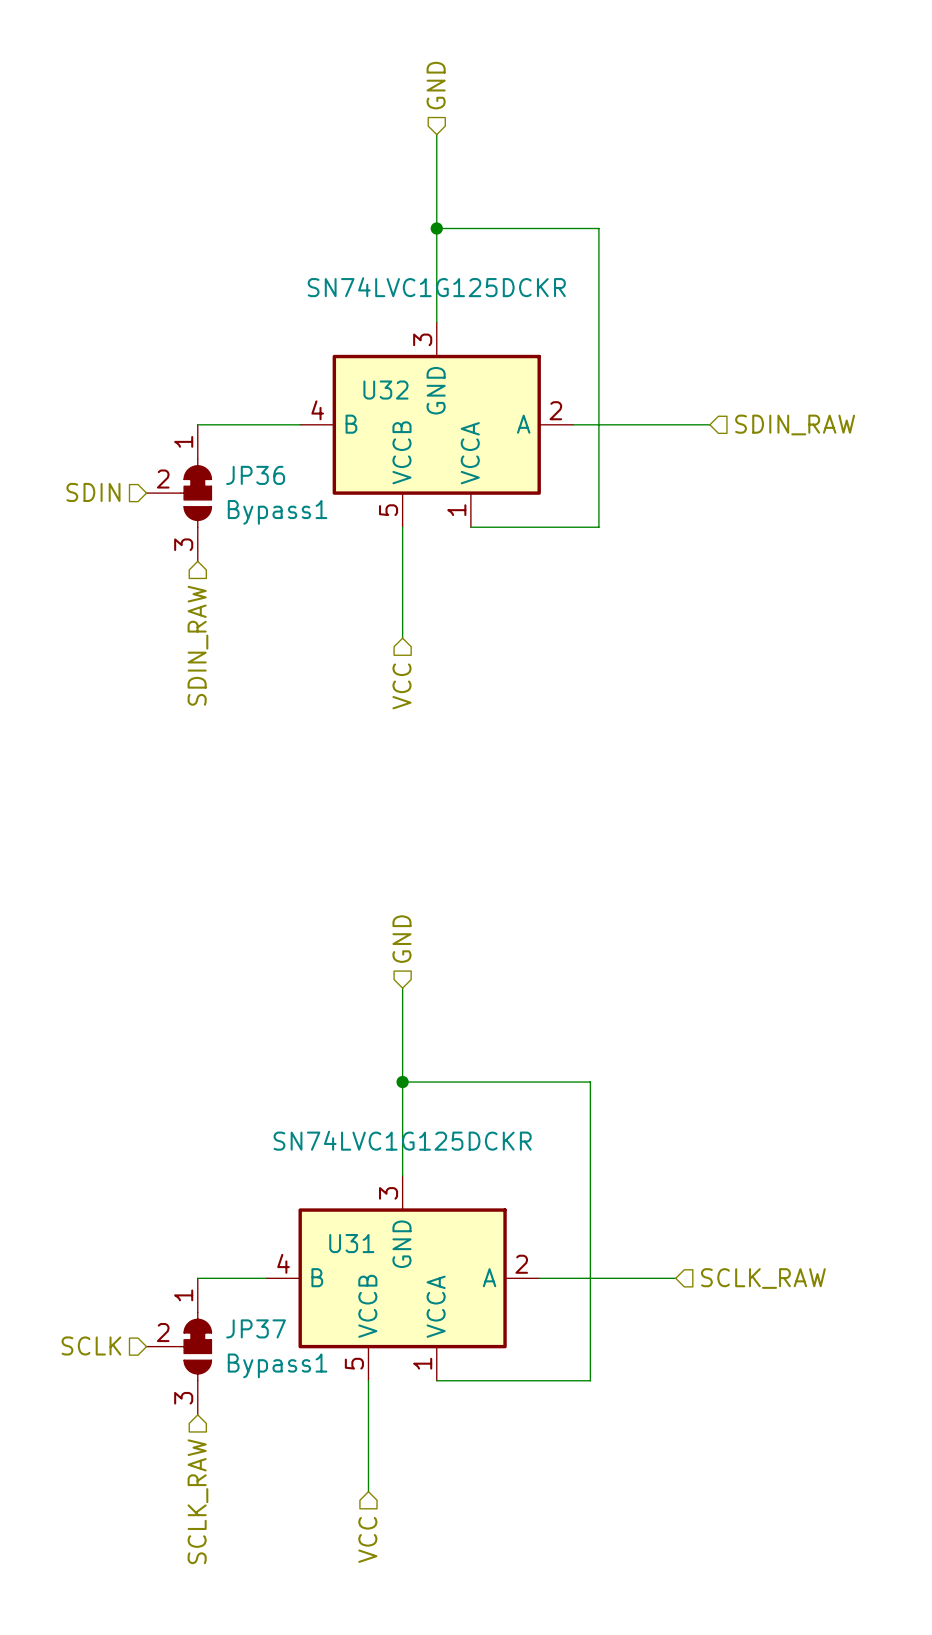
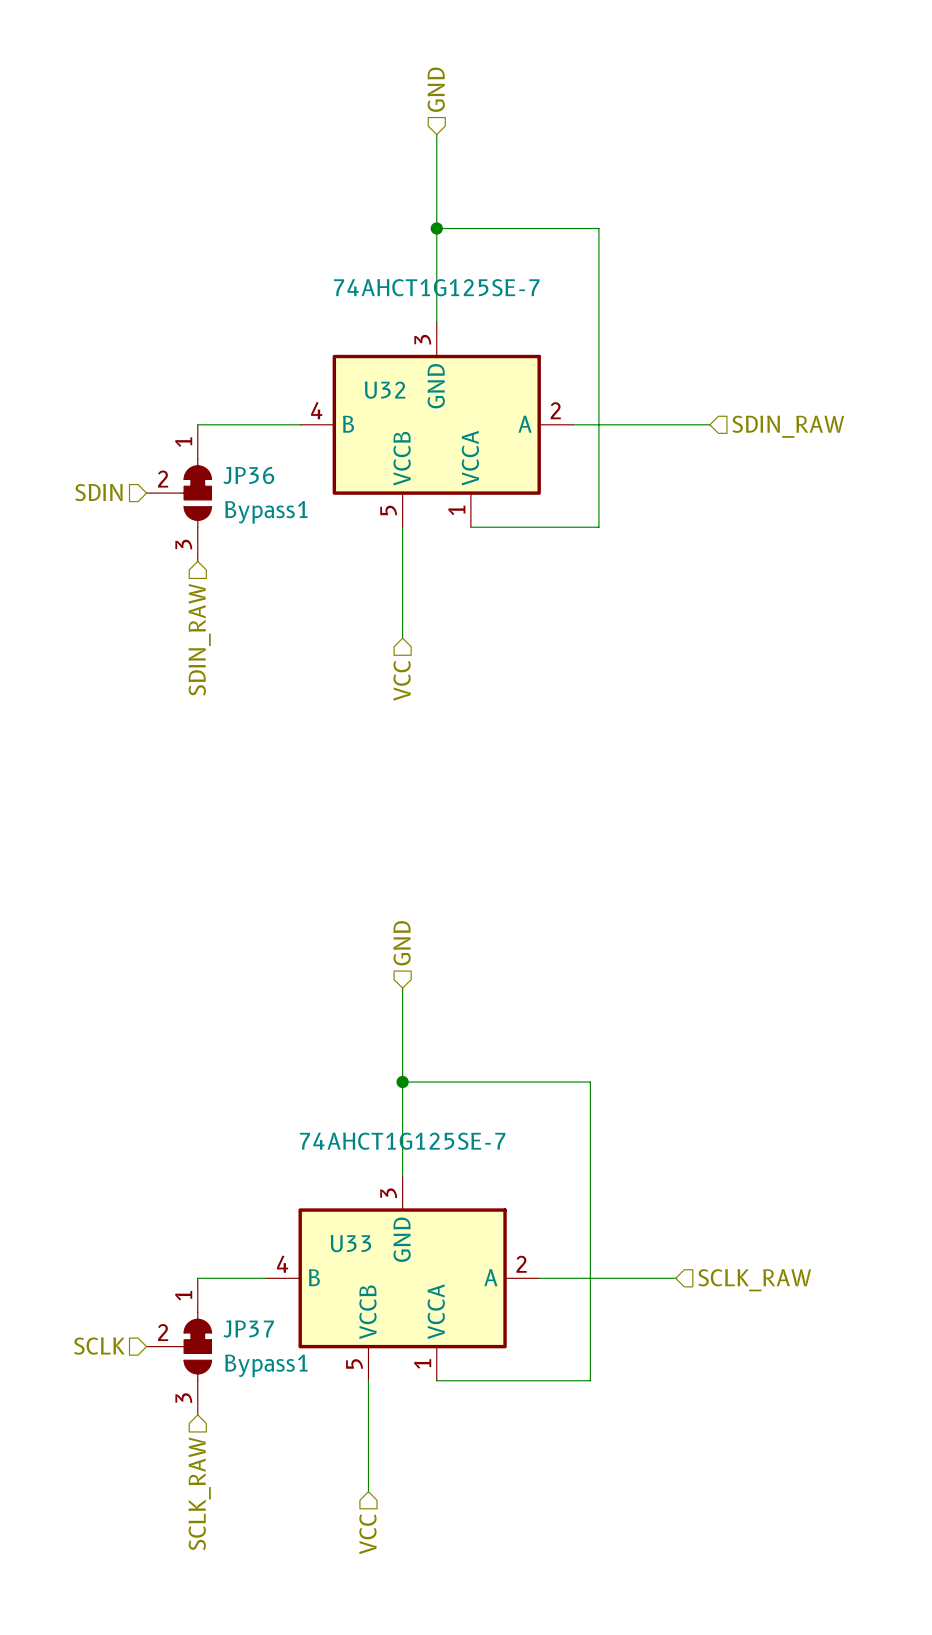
U32 value: SN74LVC1G125DCKR (436, 287) -> 74AHCT1G125SE-7 (436, 287)
U31 value: SN74LVC1G125DCKR (402, 1140) -> 74AHCT1G125SE-7 (402, 1141)
U31 name: U31 (351, 1243) -> U33 (350, 1243)

